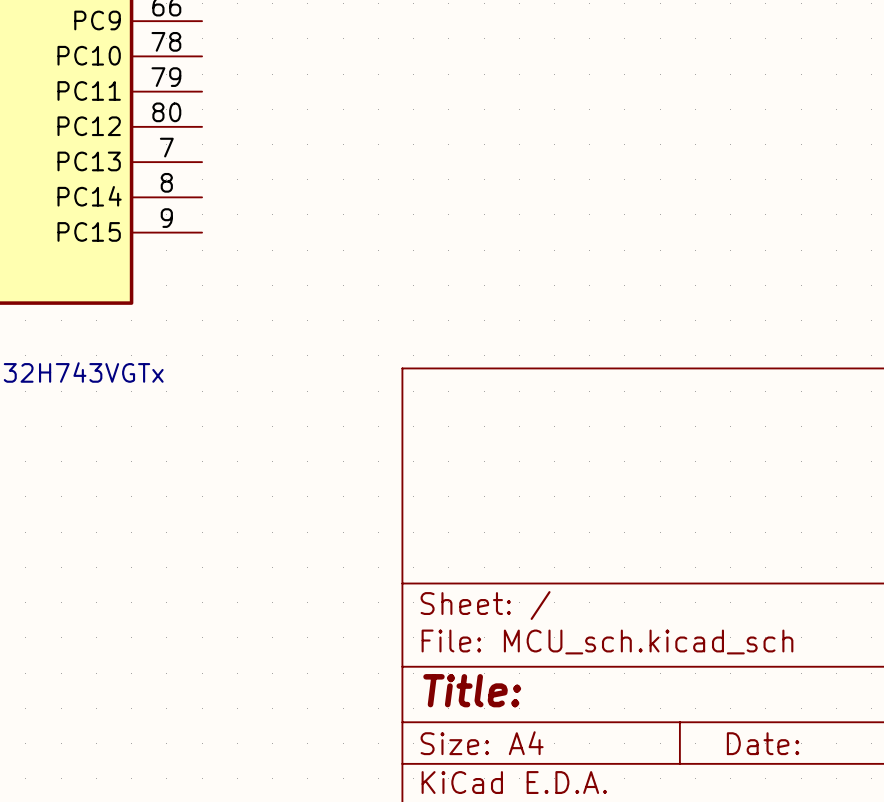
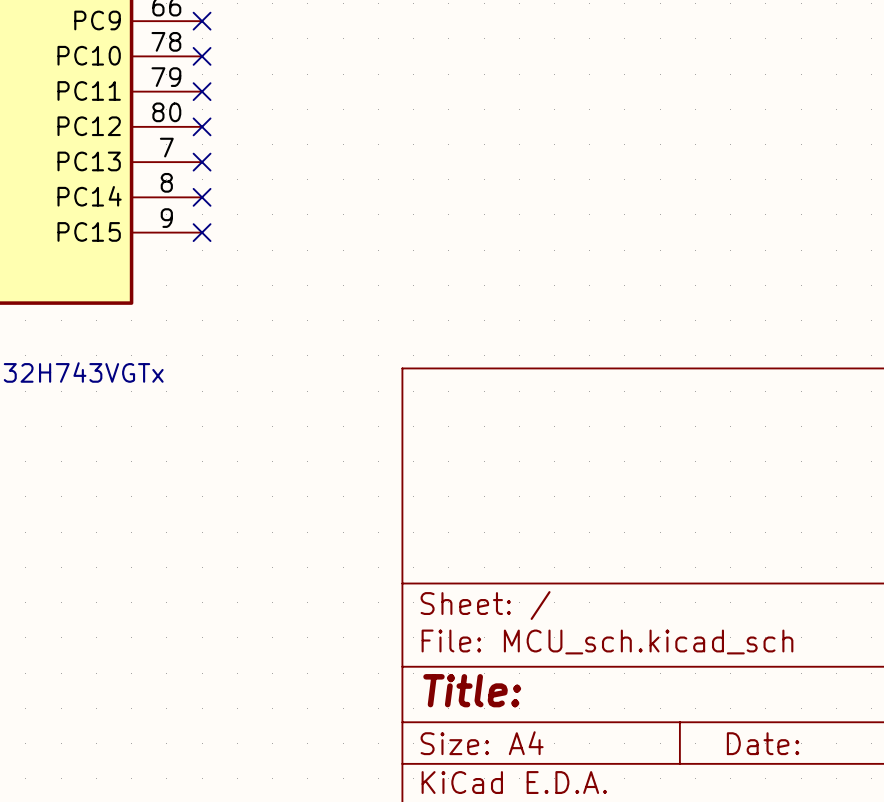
no-connect mark: none -> (202, 21)
no-connect mark: none -> (202, 56)
no-connect mark: none -> (202, 91)
no-connect mark: none -> (202, 126)
no-connect mark: none -> (202, 162)
no-connect mark: none -> (202, 197)
no-connect mark: none -> (202, 232)

